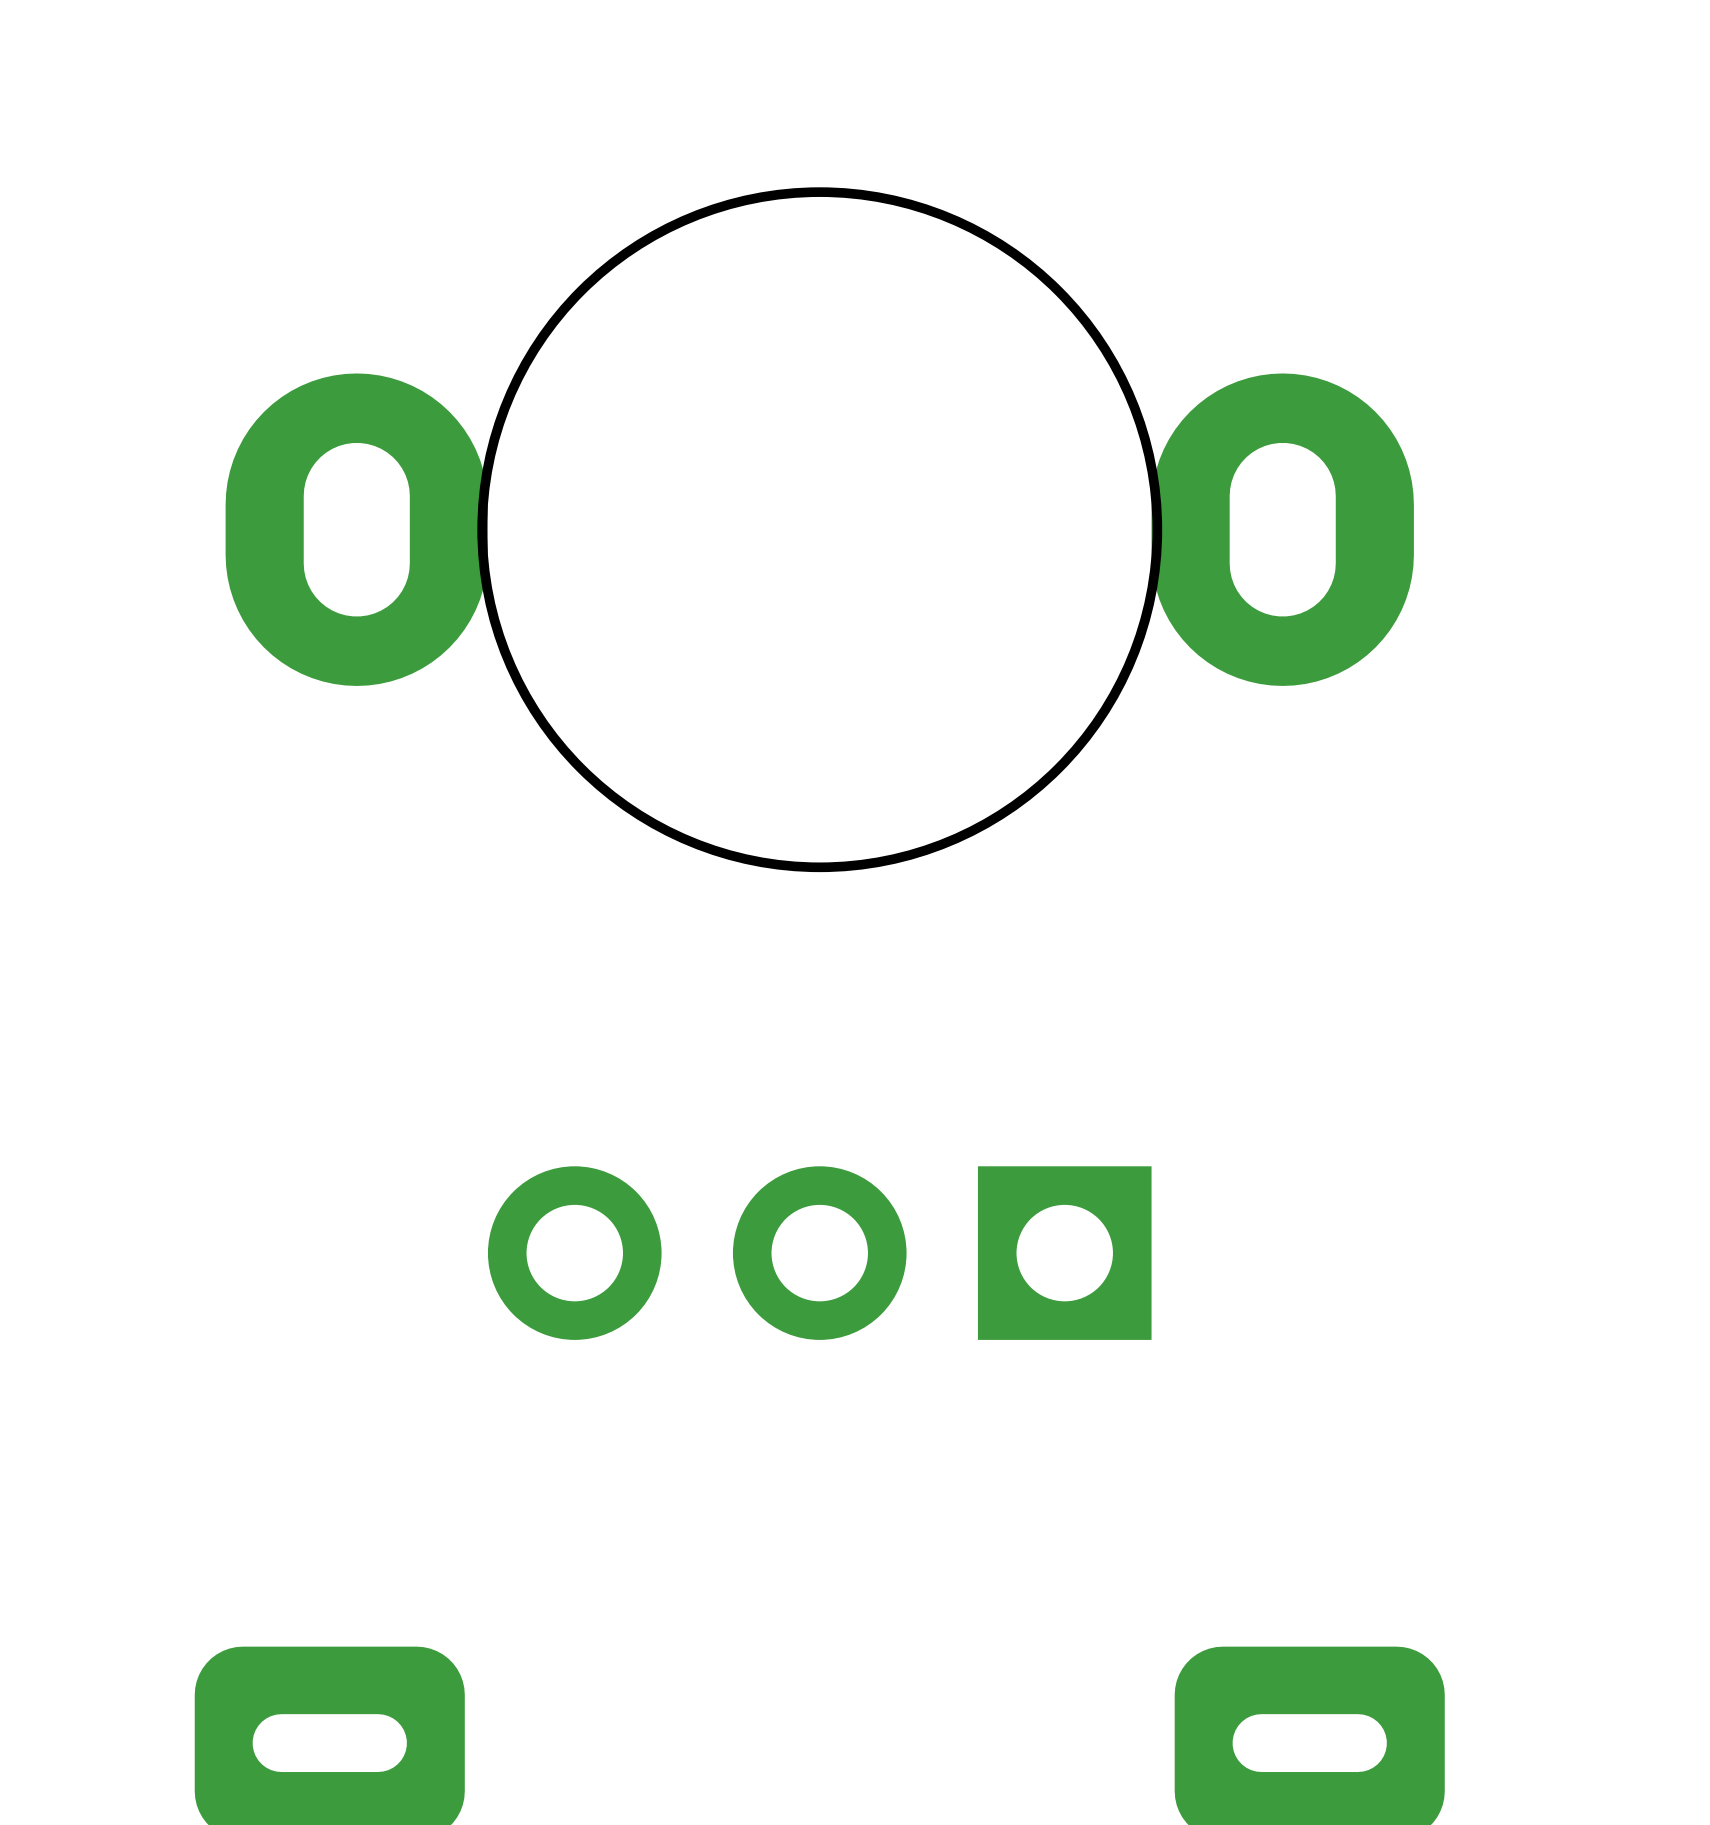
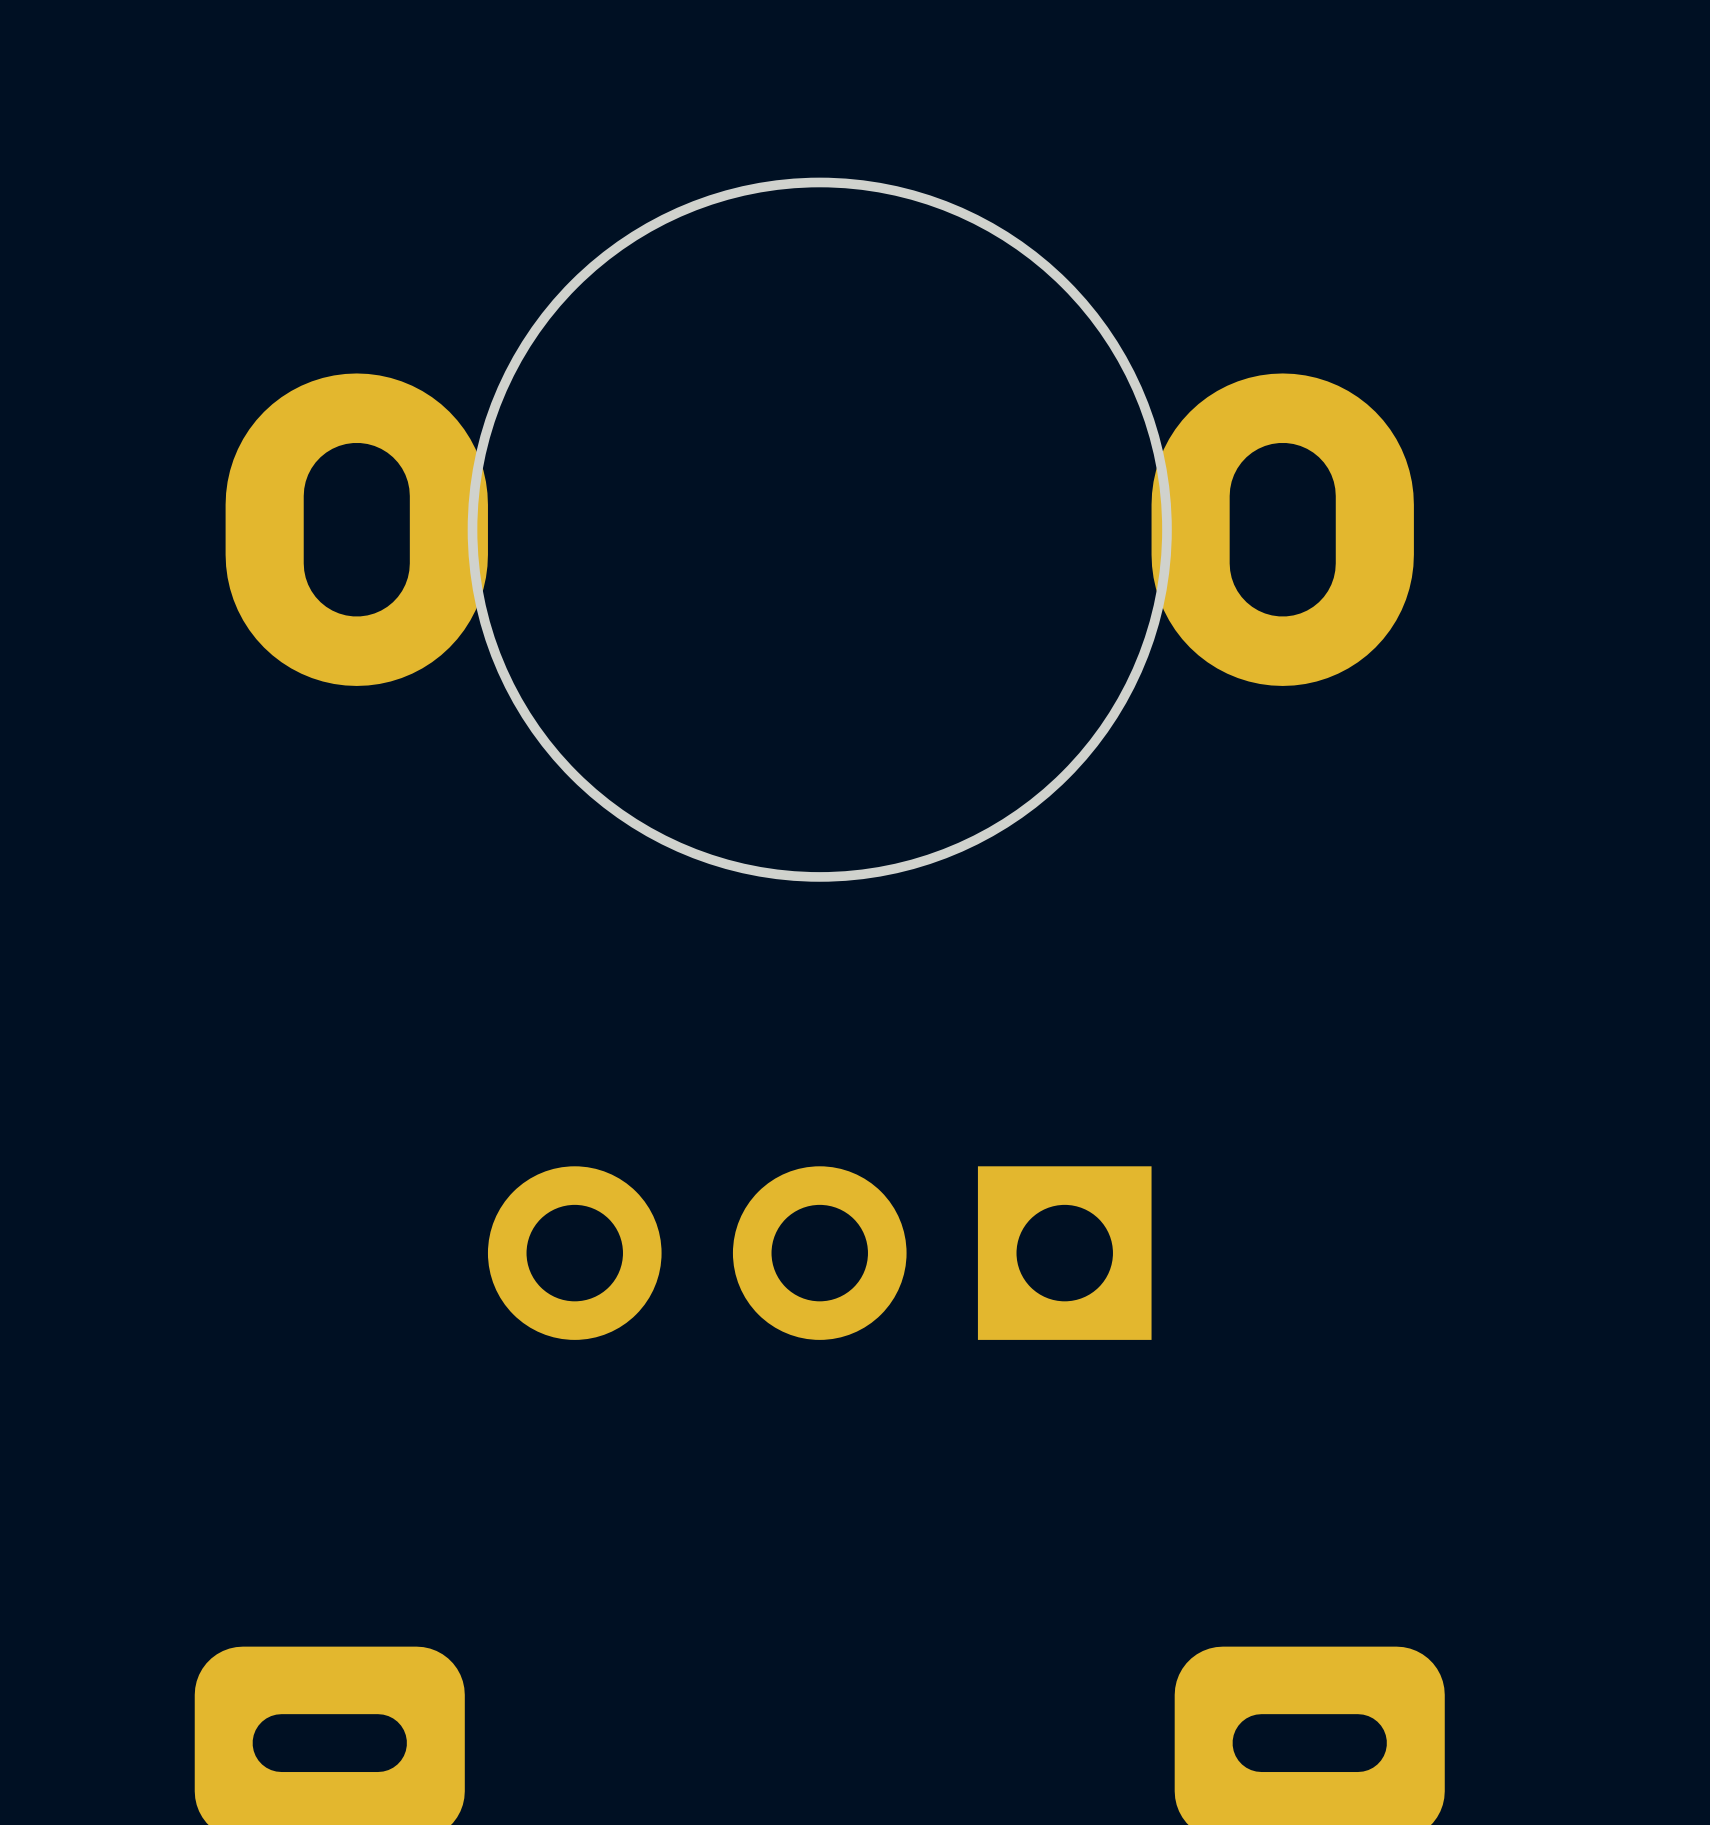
round board edge size: [477, 187, 1163, 873] -> [467, 177, 1172, 882]

